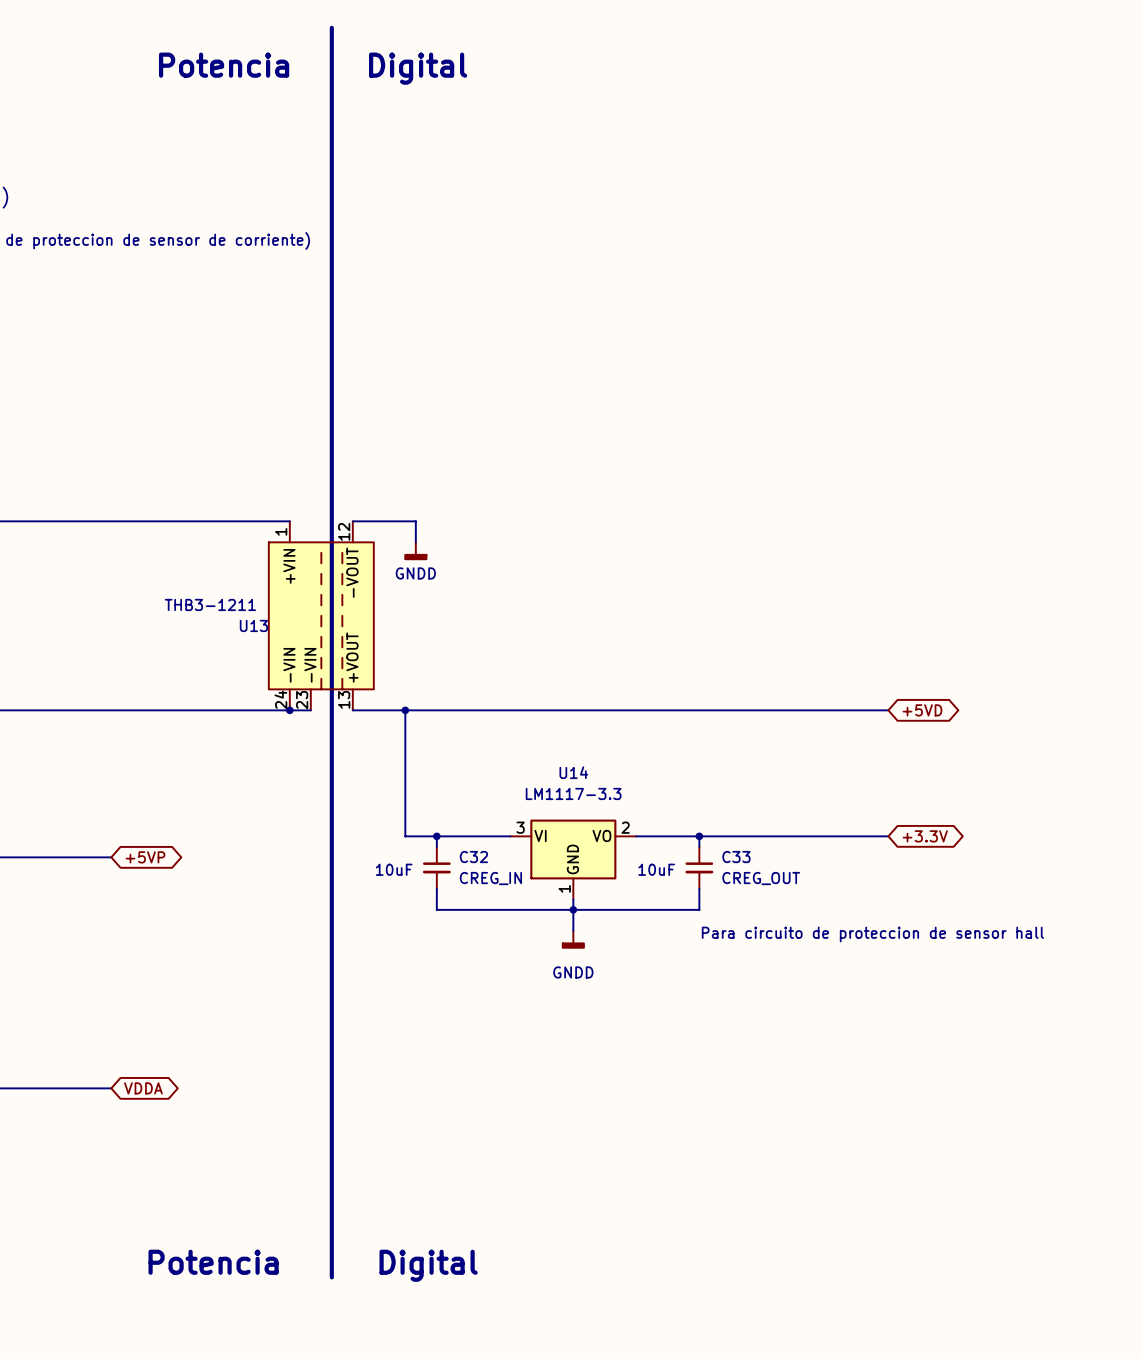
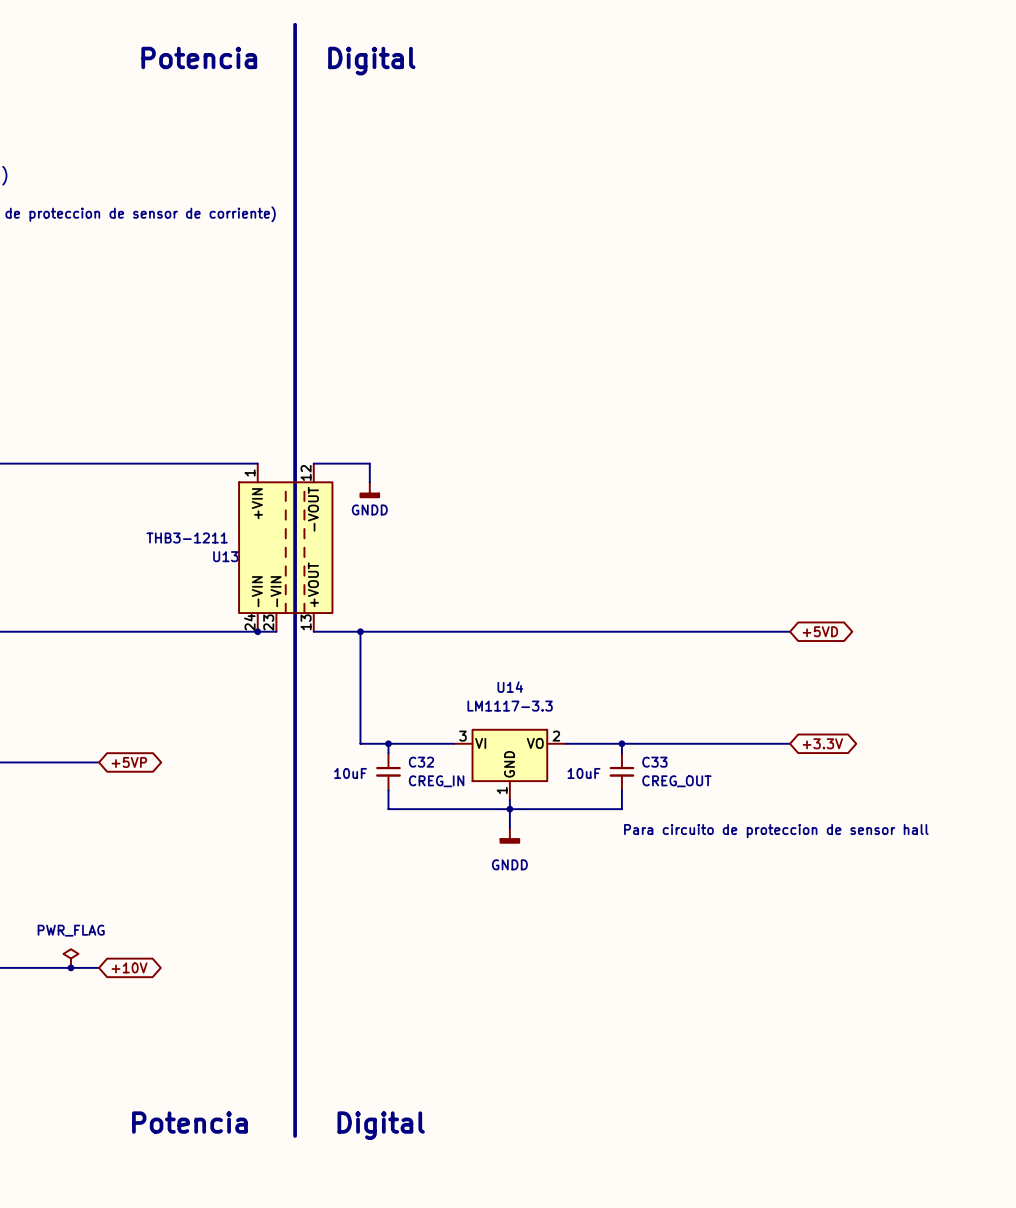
power symbol: none -> PWR_FLAG (70, 958)
junction: none -> (70, 967)
global label: VDDA (143, 1088) -> +10V (129, 967)

